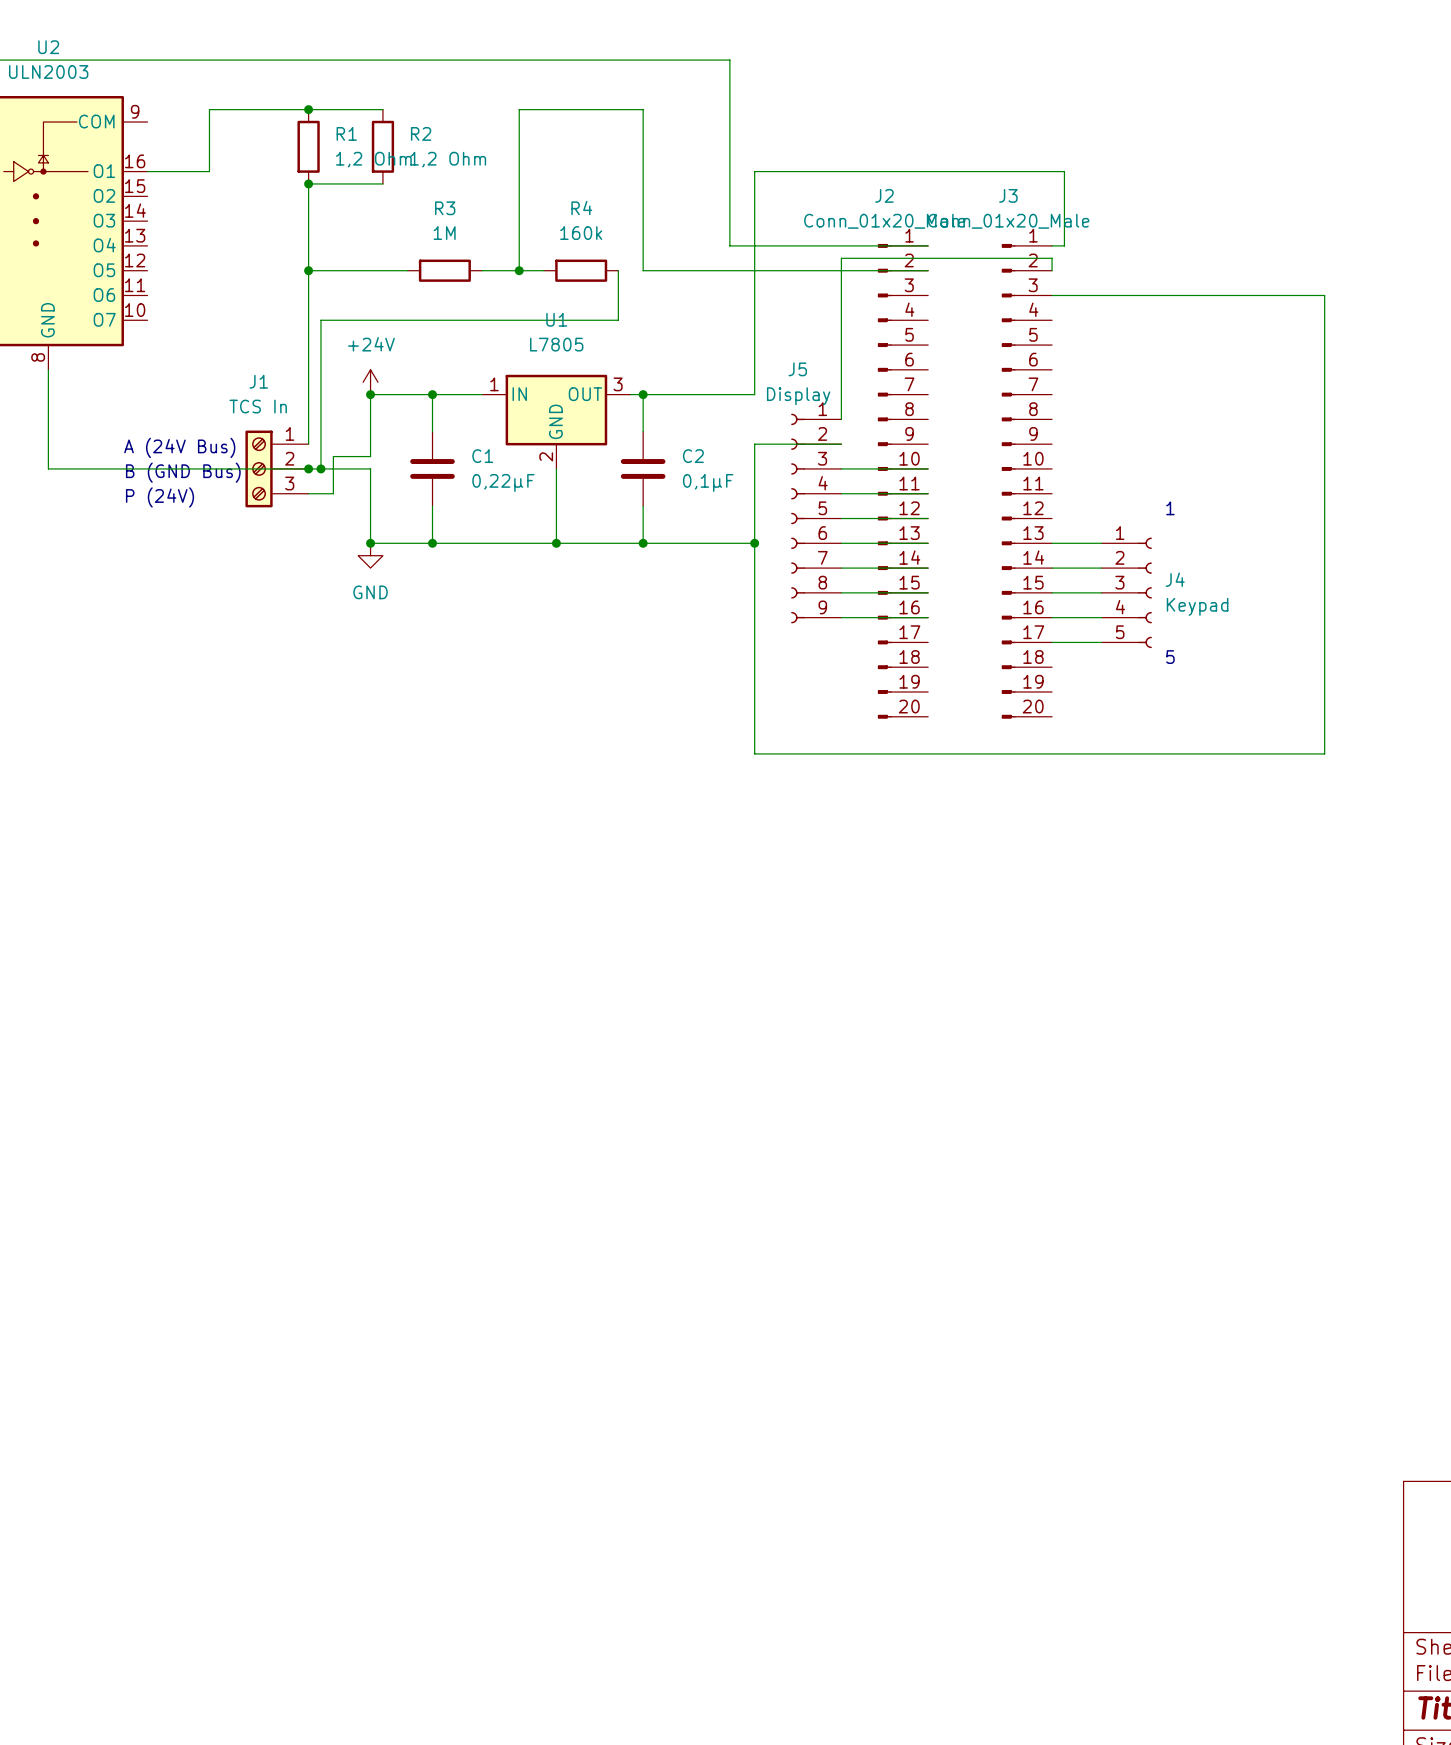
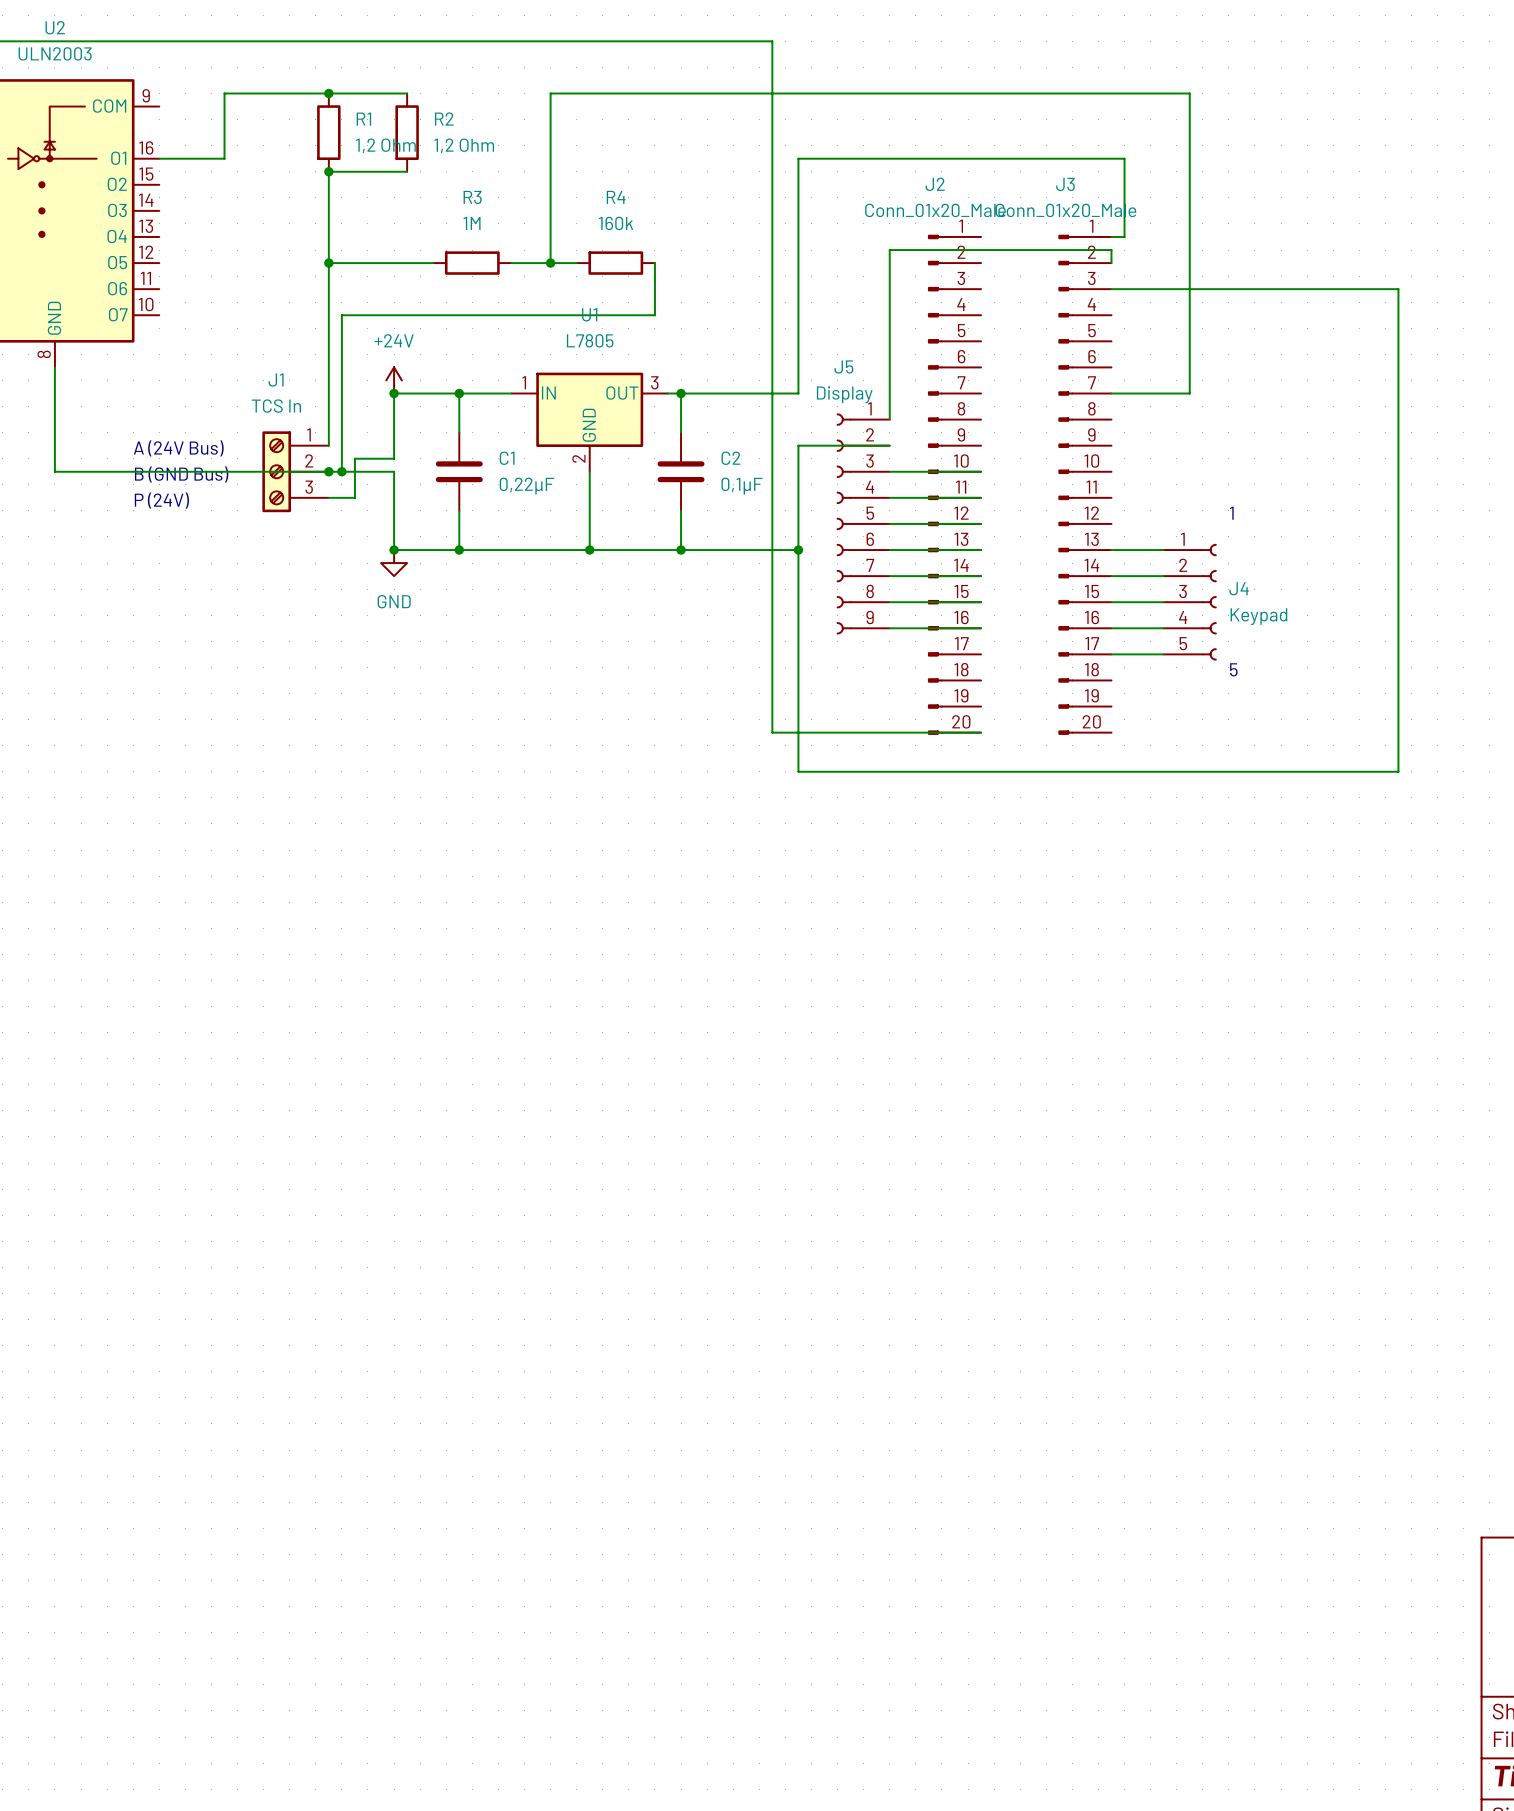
wire: (643, 109) (643, 270) (928, 270) -> (681, 93) (1189, 93) (1189, 393) (1111, 393)
wire: (729, 245) (928, 245) -> (772, 236) (772, 732) (981, 732)

